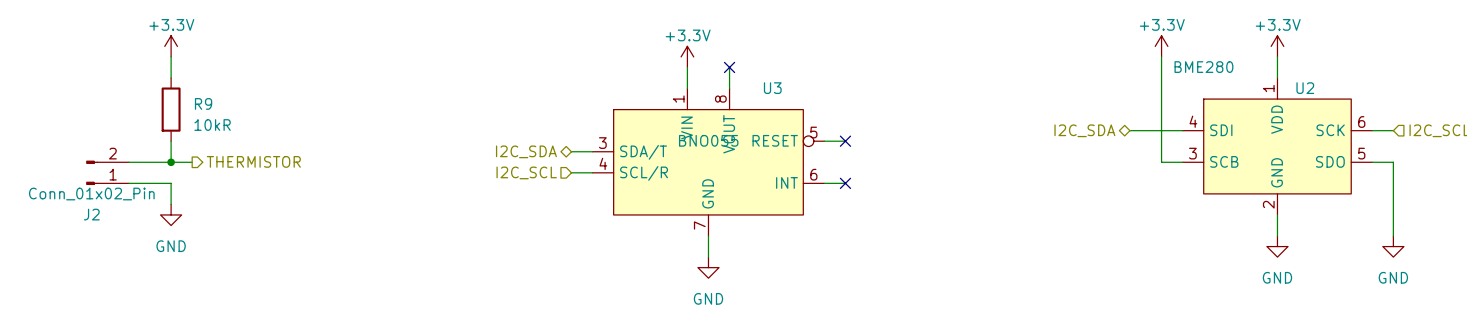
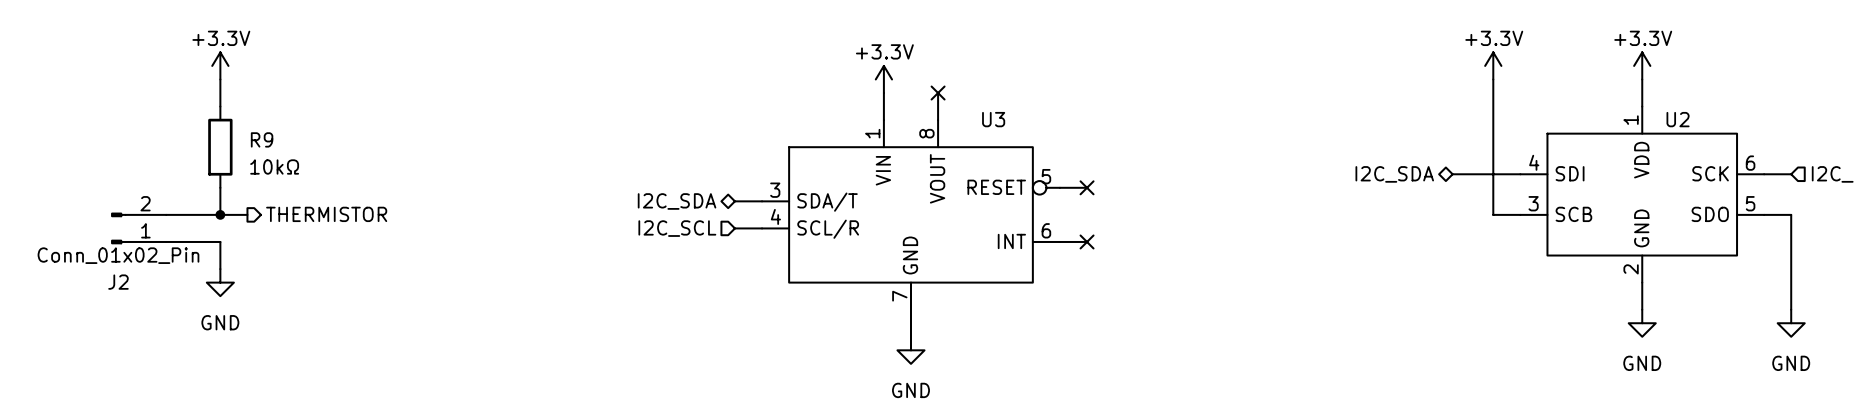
U2 value: BME280 (1203, 67) -> none
R9 value: 10kR (212, 125) -> 10kΩ (274, 166)
U3 value: BNO055 (708, 140) -> none

